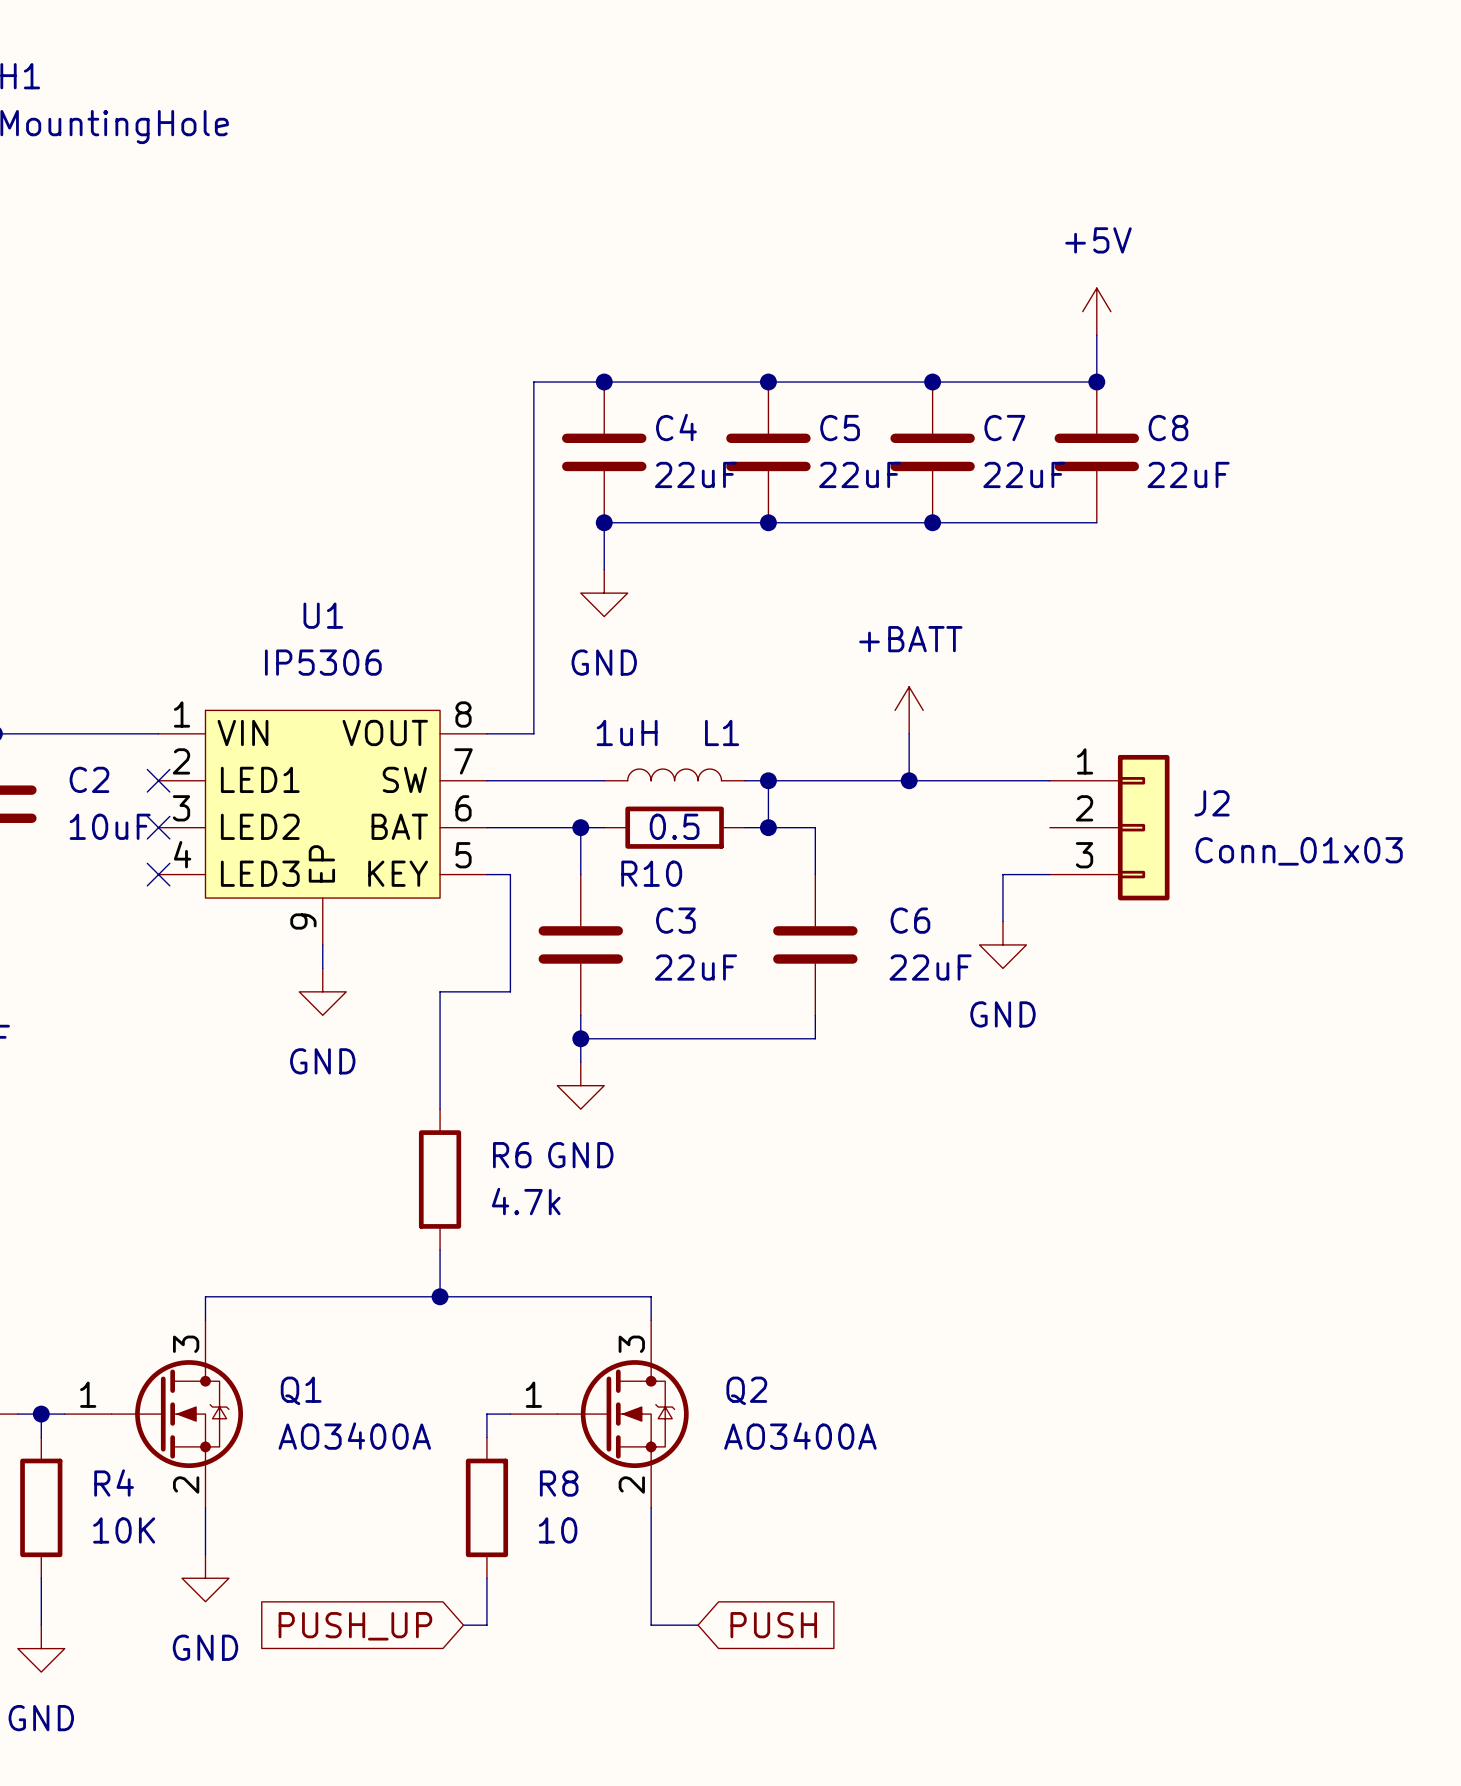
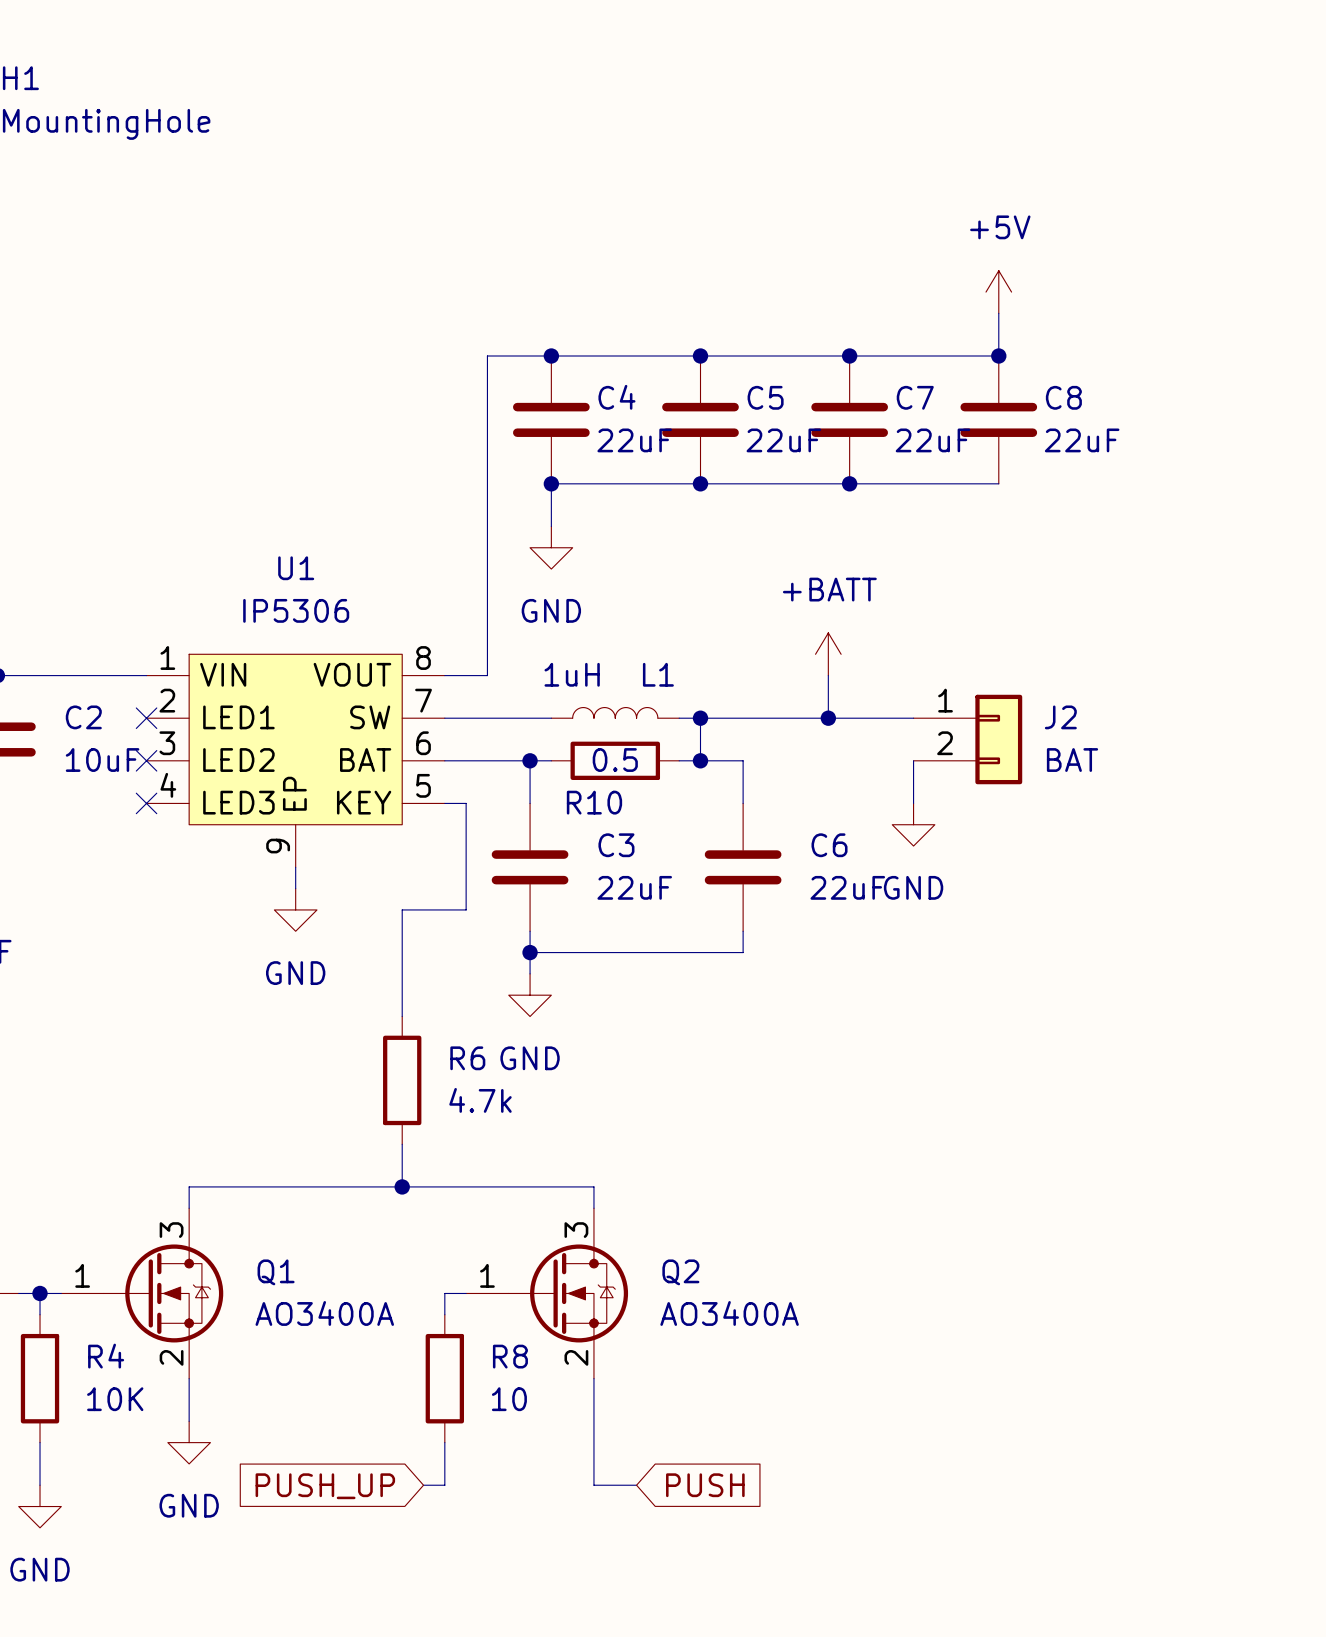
J2 symbol: [1049, 754, 1170, 901] -> [913, 694, 1023, 785]
wire: none -> (913, 760) (913, 803)
J2 value: Conn_01x03 (1299, 851) -> BAT (1072, 760)
wire: (1049, 874) (1002, 874) (1002, 921) -> none
power symbol position: GND (1002, 944) -> GND (913, 824)

